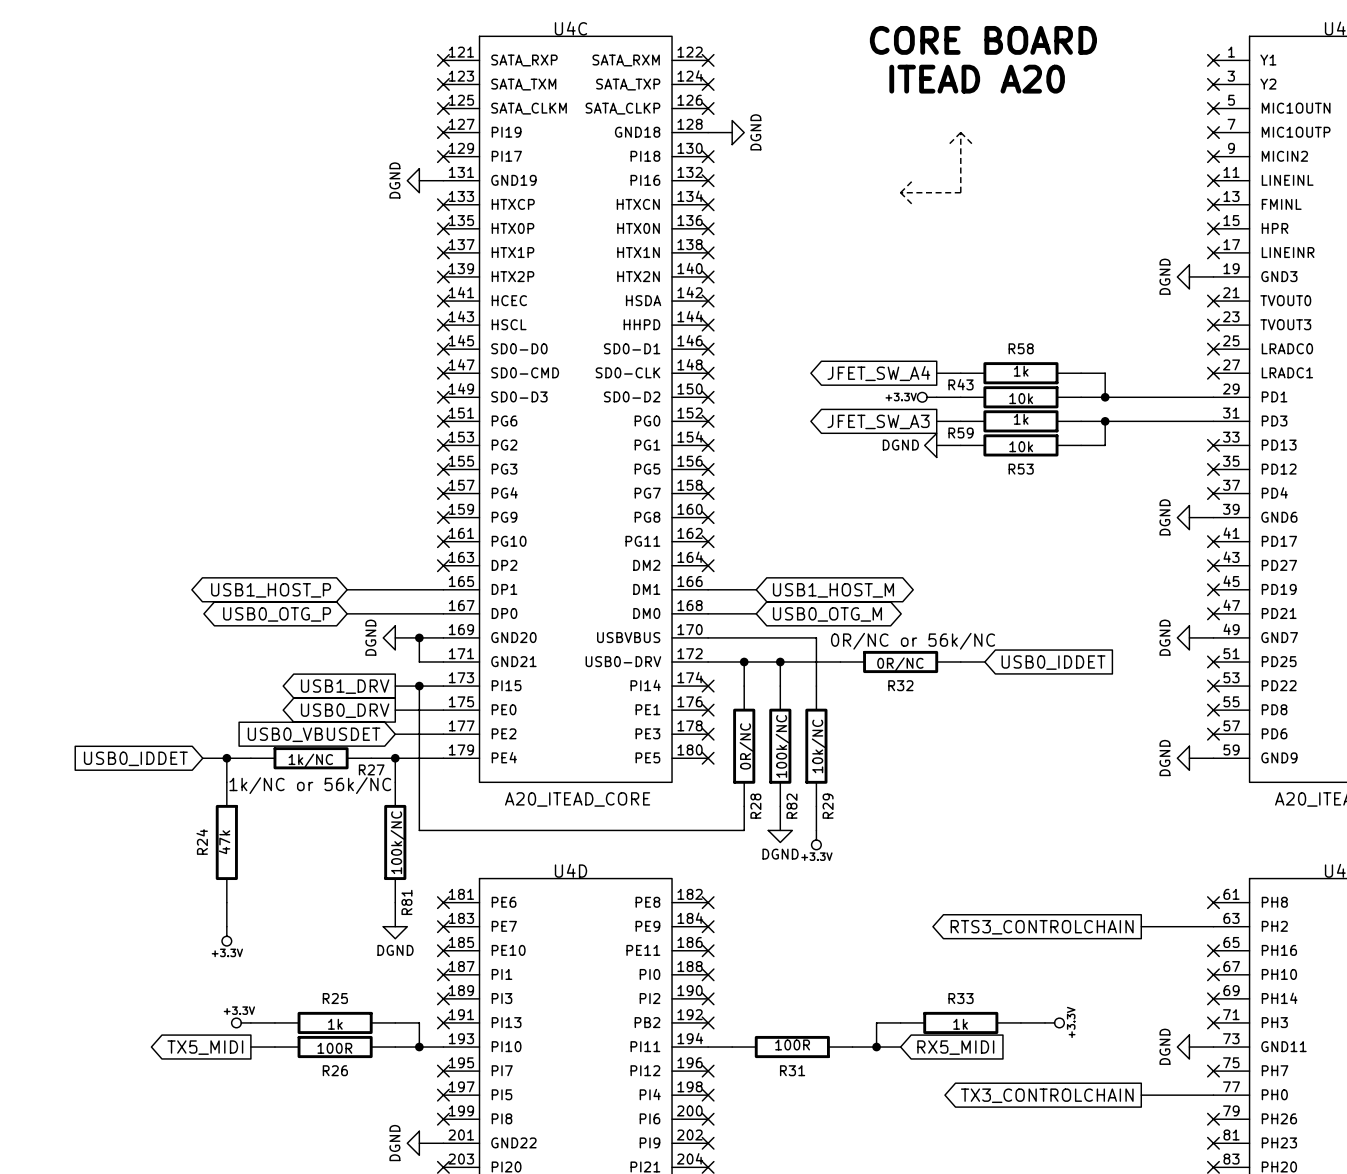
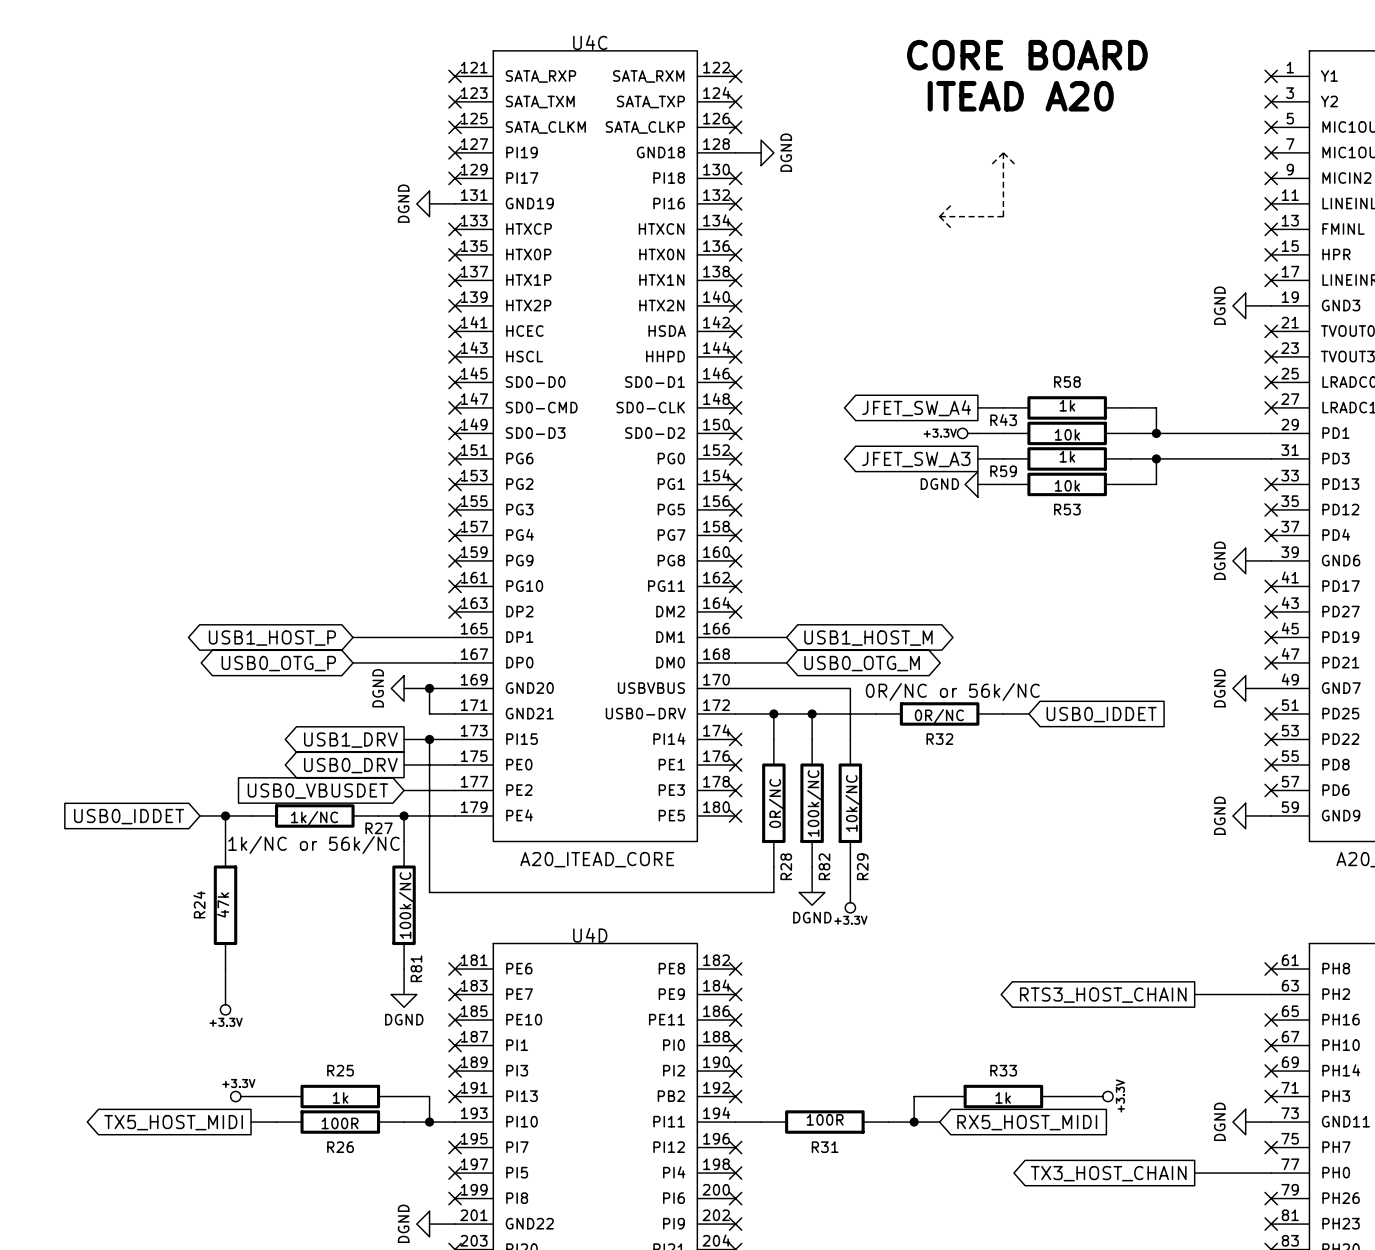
global label: RTS3_CONTROLCHAIN (1042, 927) -> RTS3_HOST_CHAIN (1103, 995)
global label: TX5_MIDI (205, 1047) -> TX5_HOST_MIDI (173, 1122)
global label: RX5_MIDI (955, 1047) -> RX5_HOST_MIDI (1027, 1122)
global label: TX3_CONTROLCHAIN (1047, 1095) -> TX3_HOST_CHAIN (1108, 1173)

